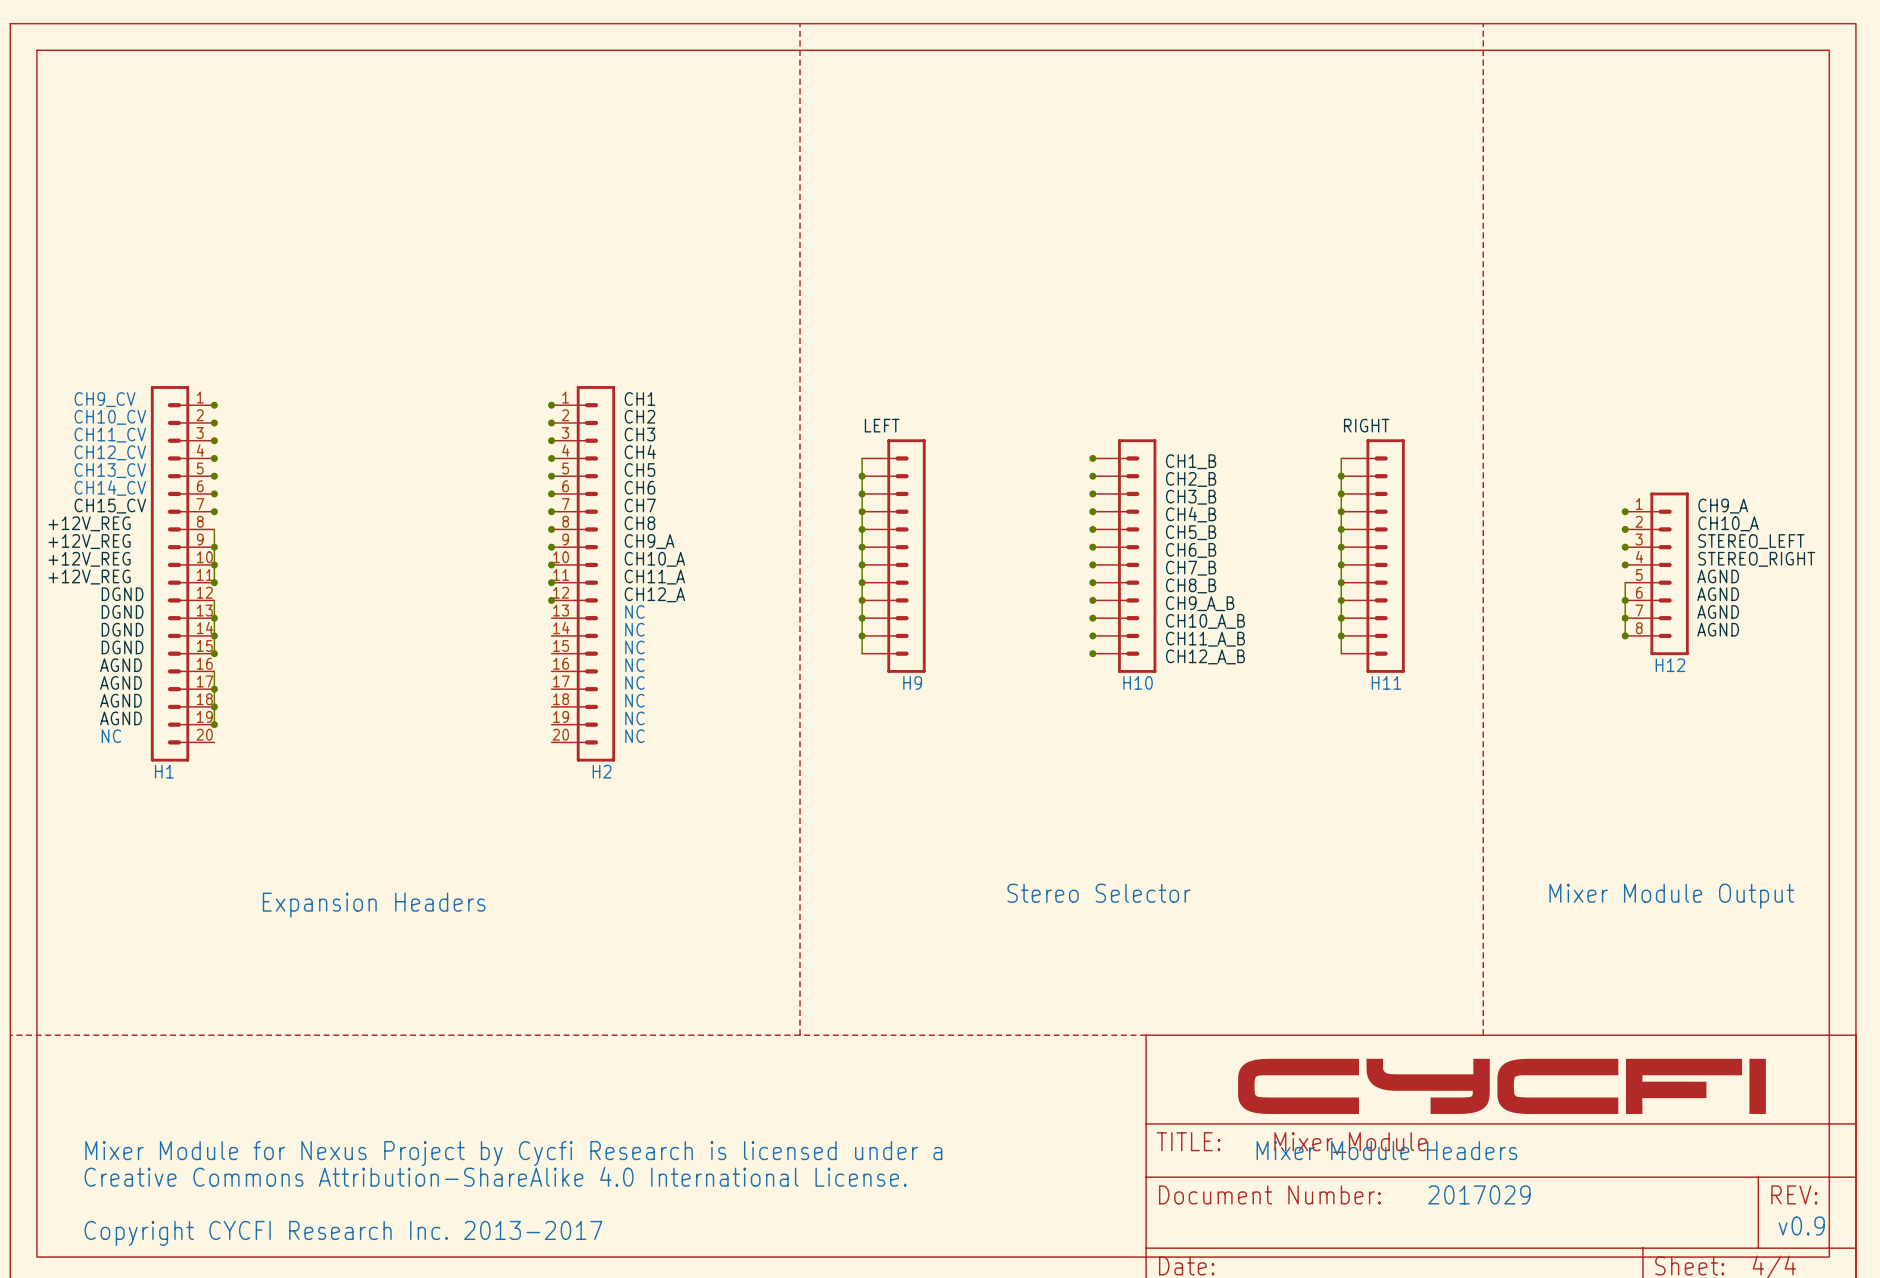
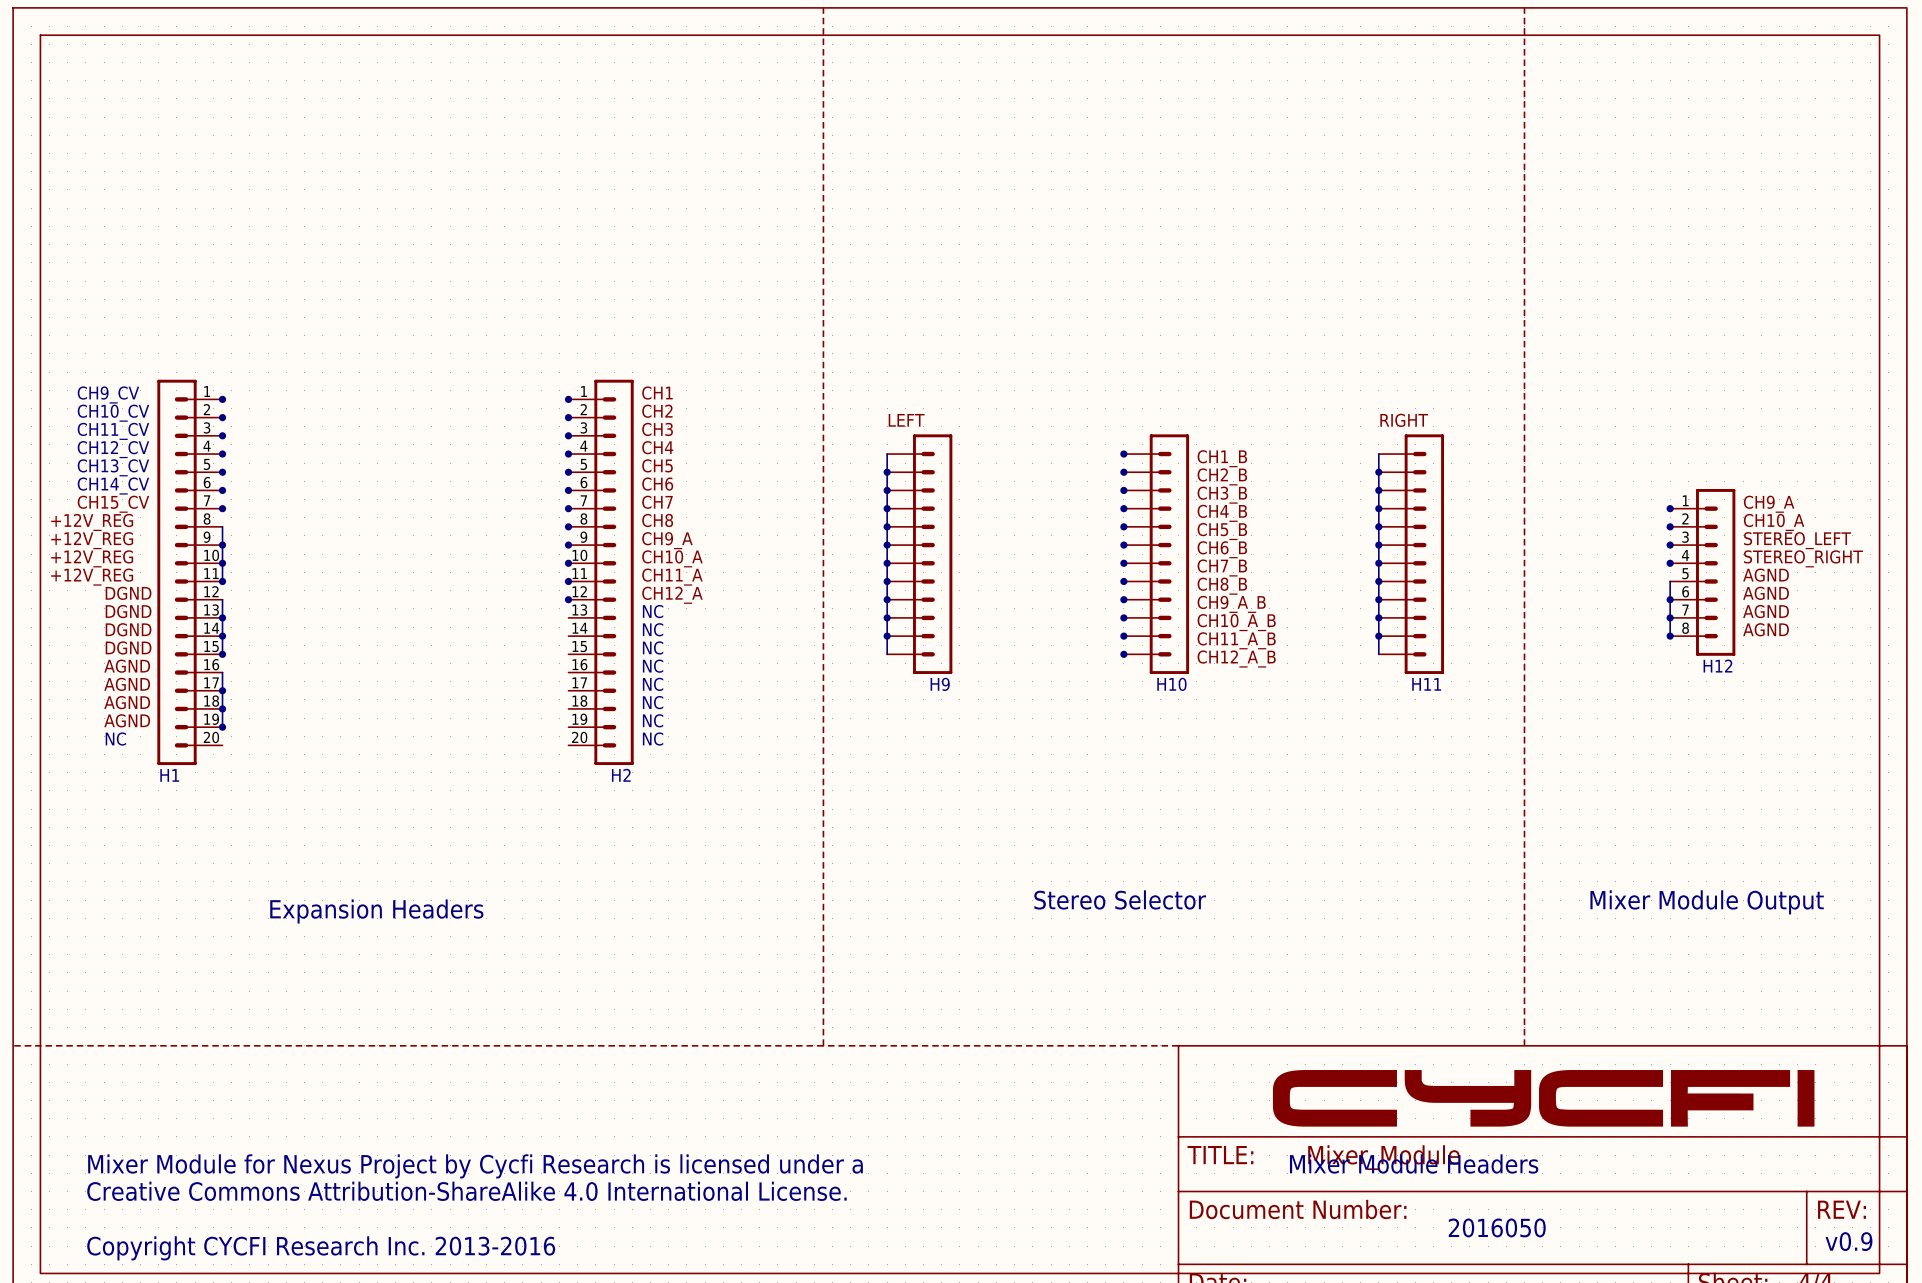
text: 2017029 (1479, 1194) -> none
text: none -> 2016050 (1497, 1227)
text: Copyright CYCFI Research Inc. 2013-2017 (343, 1233) -> Copyright CYCFI Research Inc. 2013-2016 (321, 1248)

